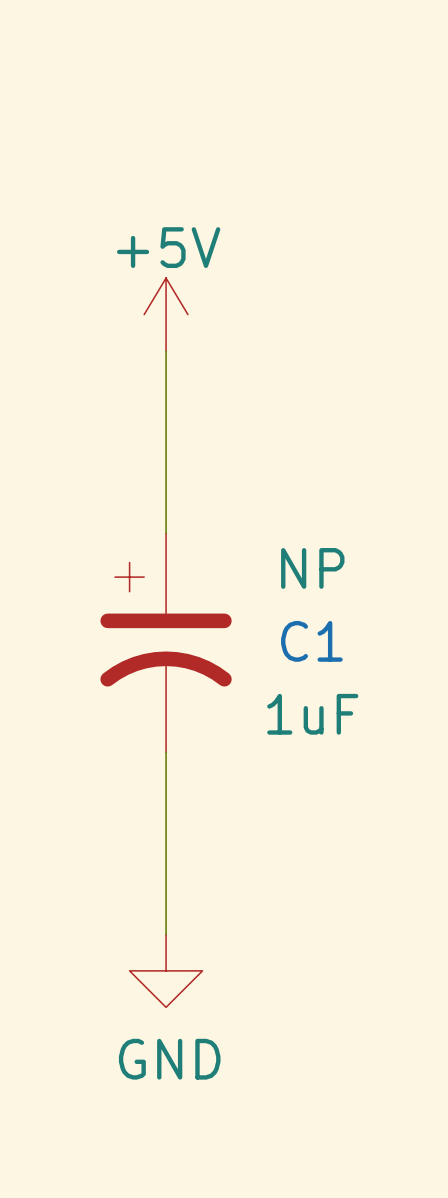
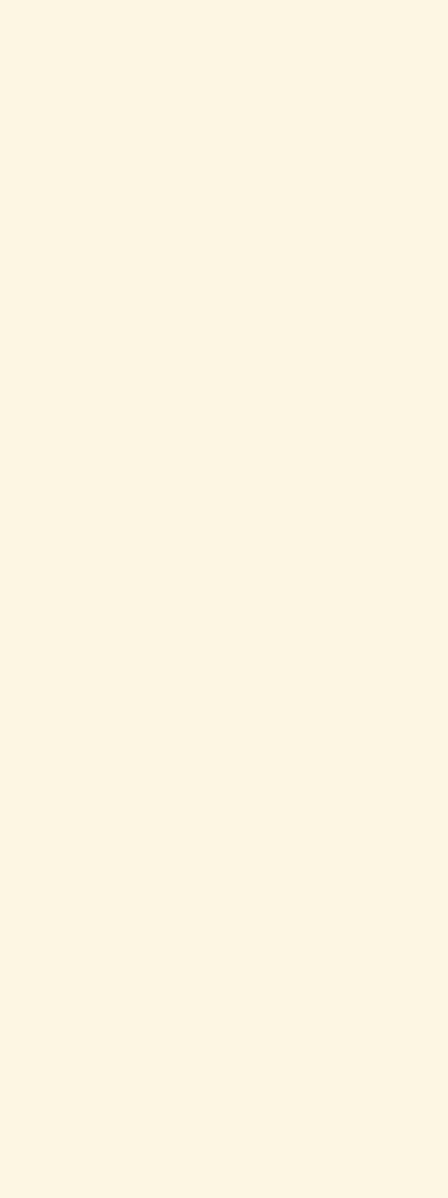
power symbol: +5V (166, 314) -> none
wire: (166, 351) (166, 533) -> none
C1: 1uF (166, 642) -> none
wire: (166, 752) (166, 934) -> none
power symbol: GND (166, 970) -> none

